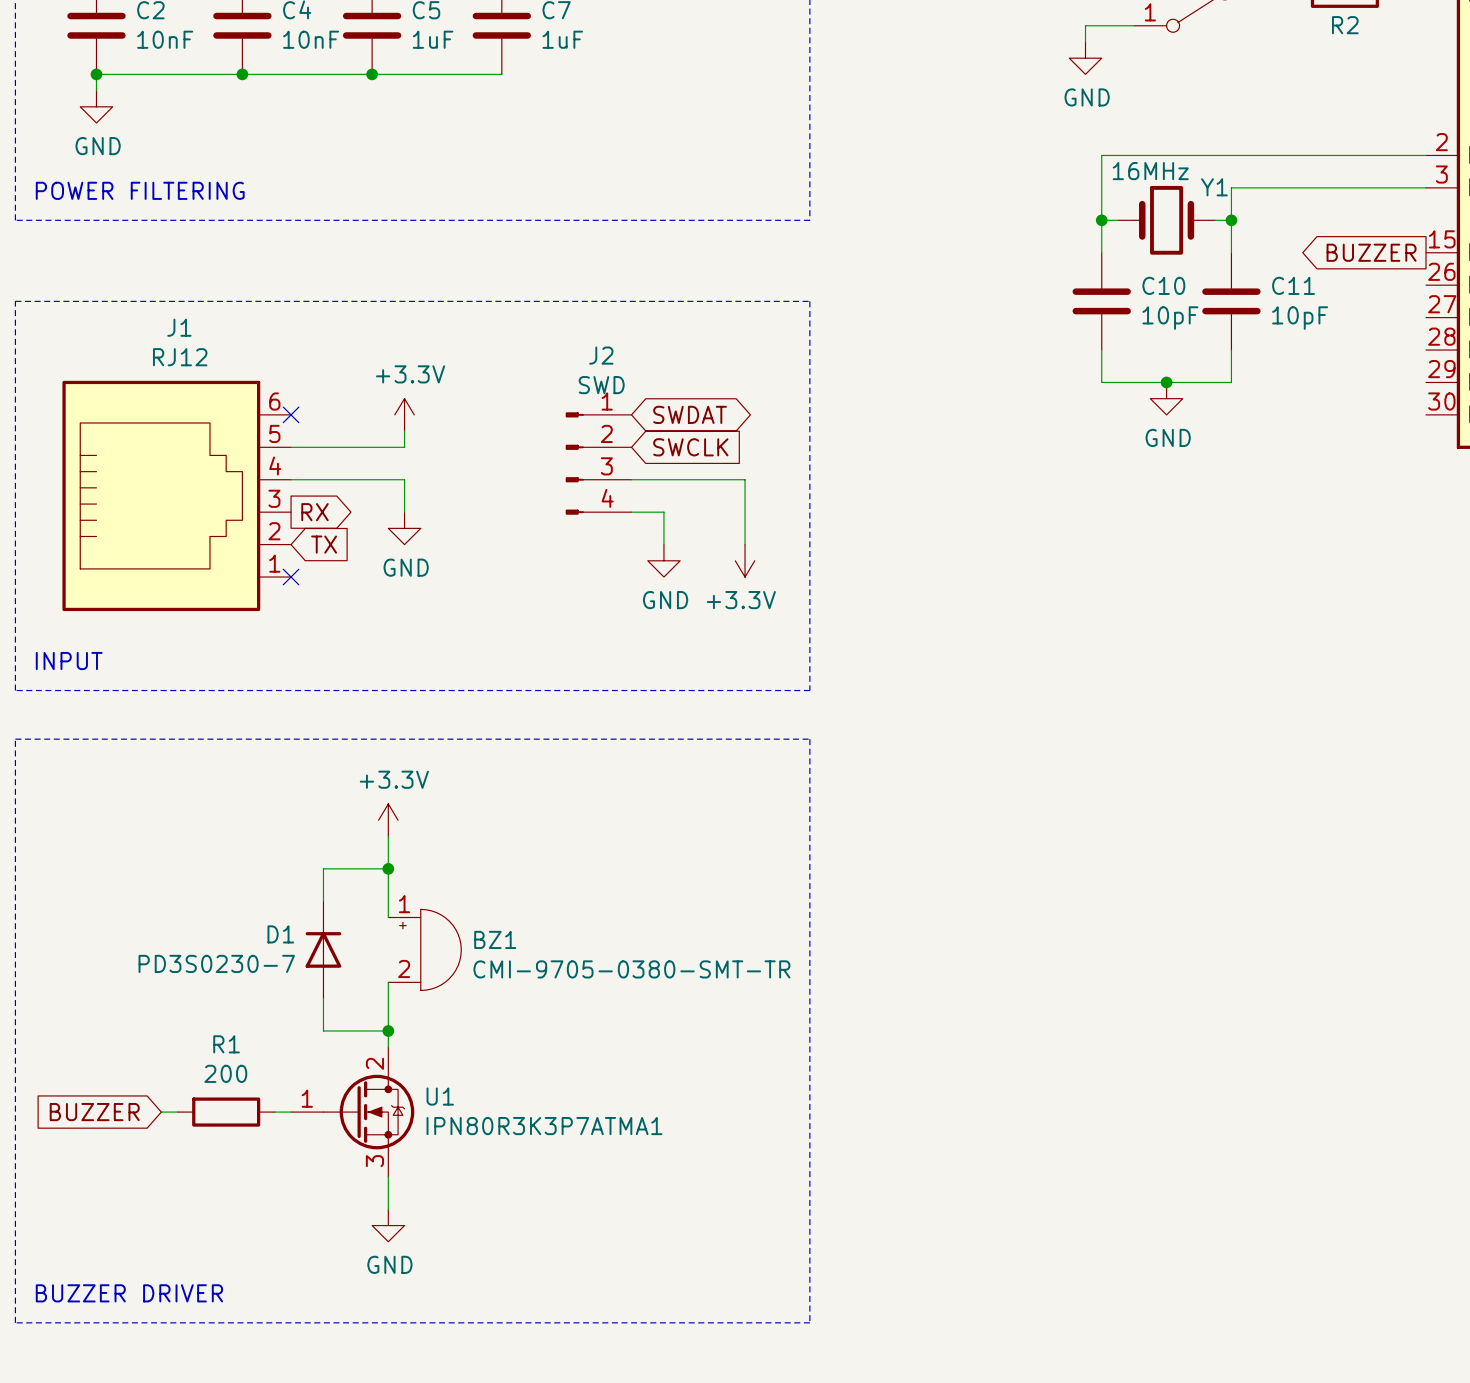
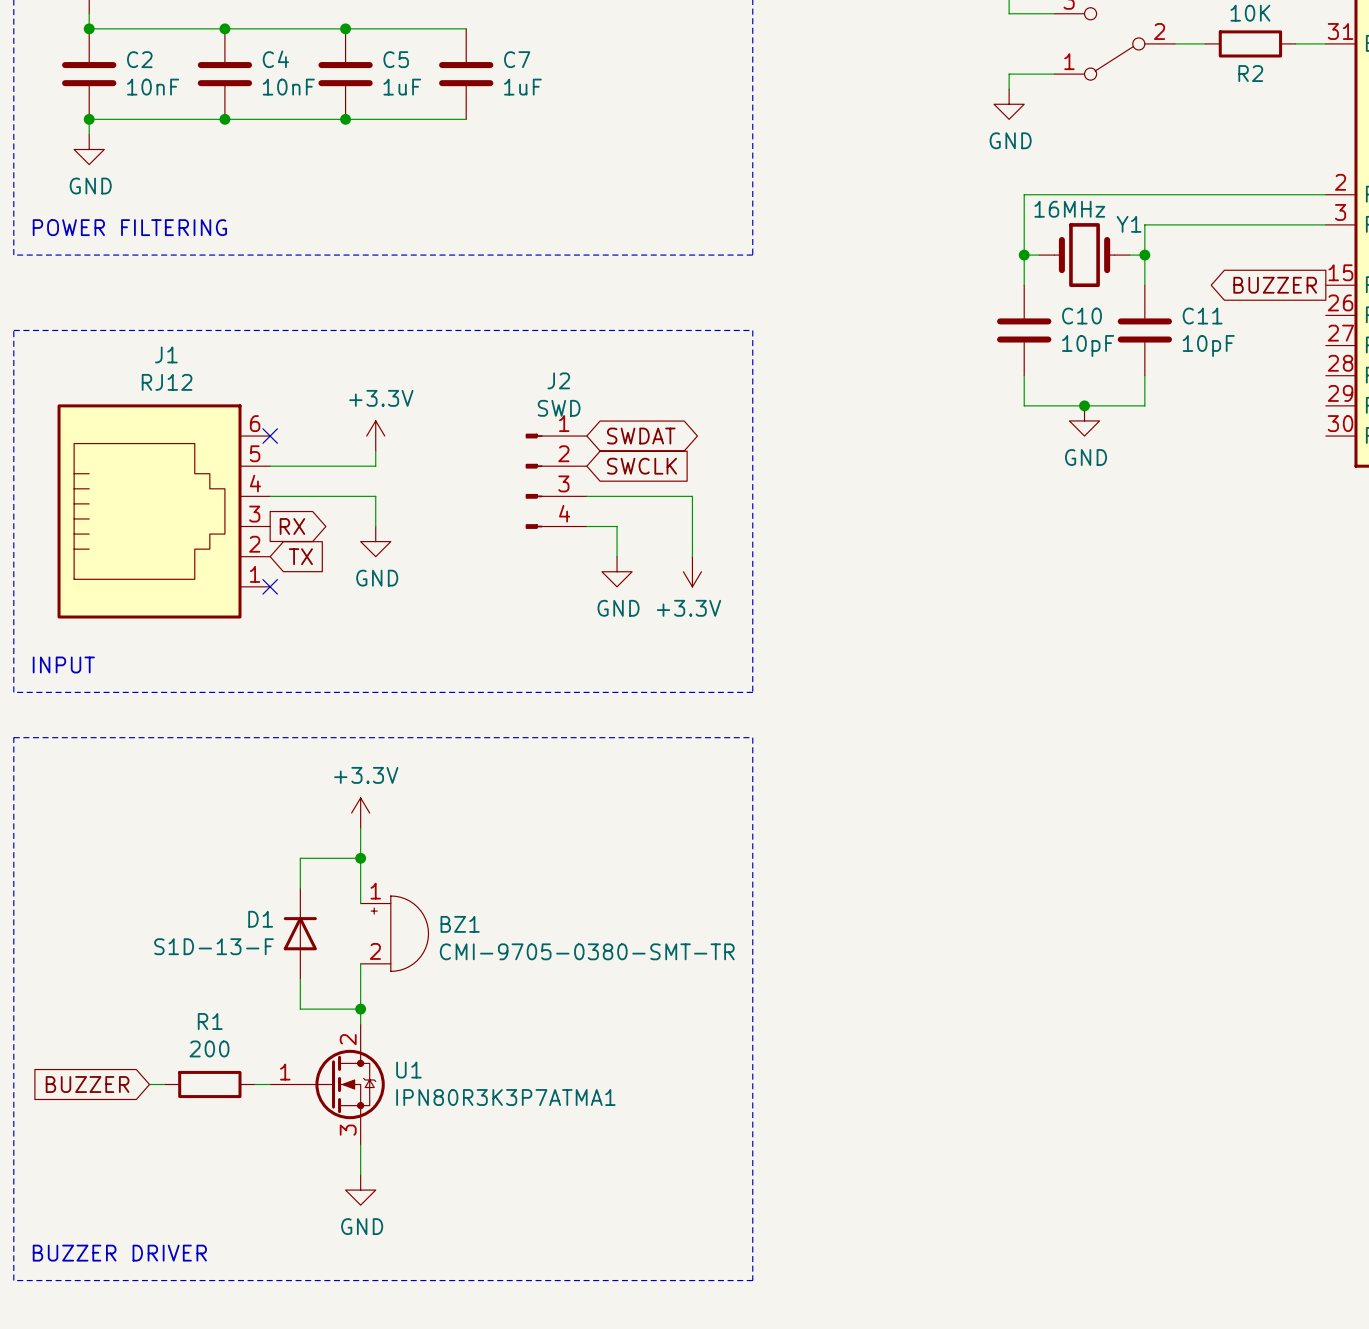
D1 value: PD3S0230-7 (216, 963) -> S1D-13-F (213, 946)

